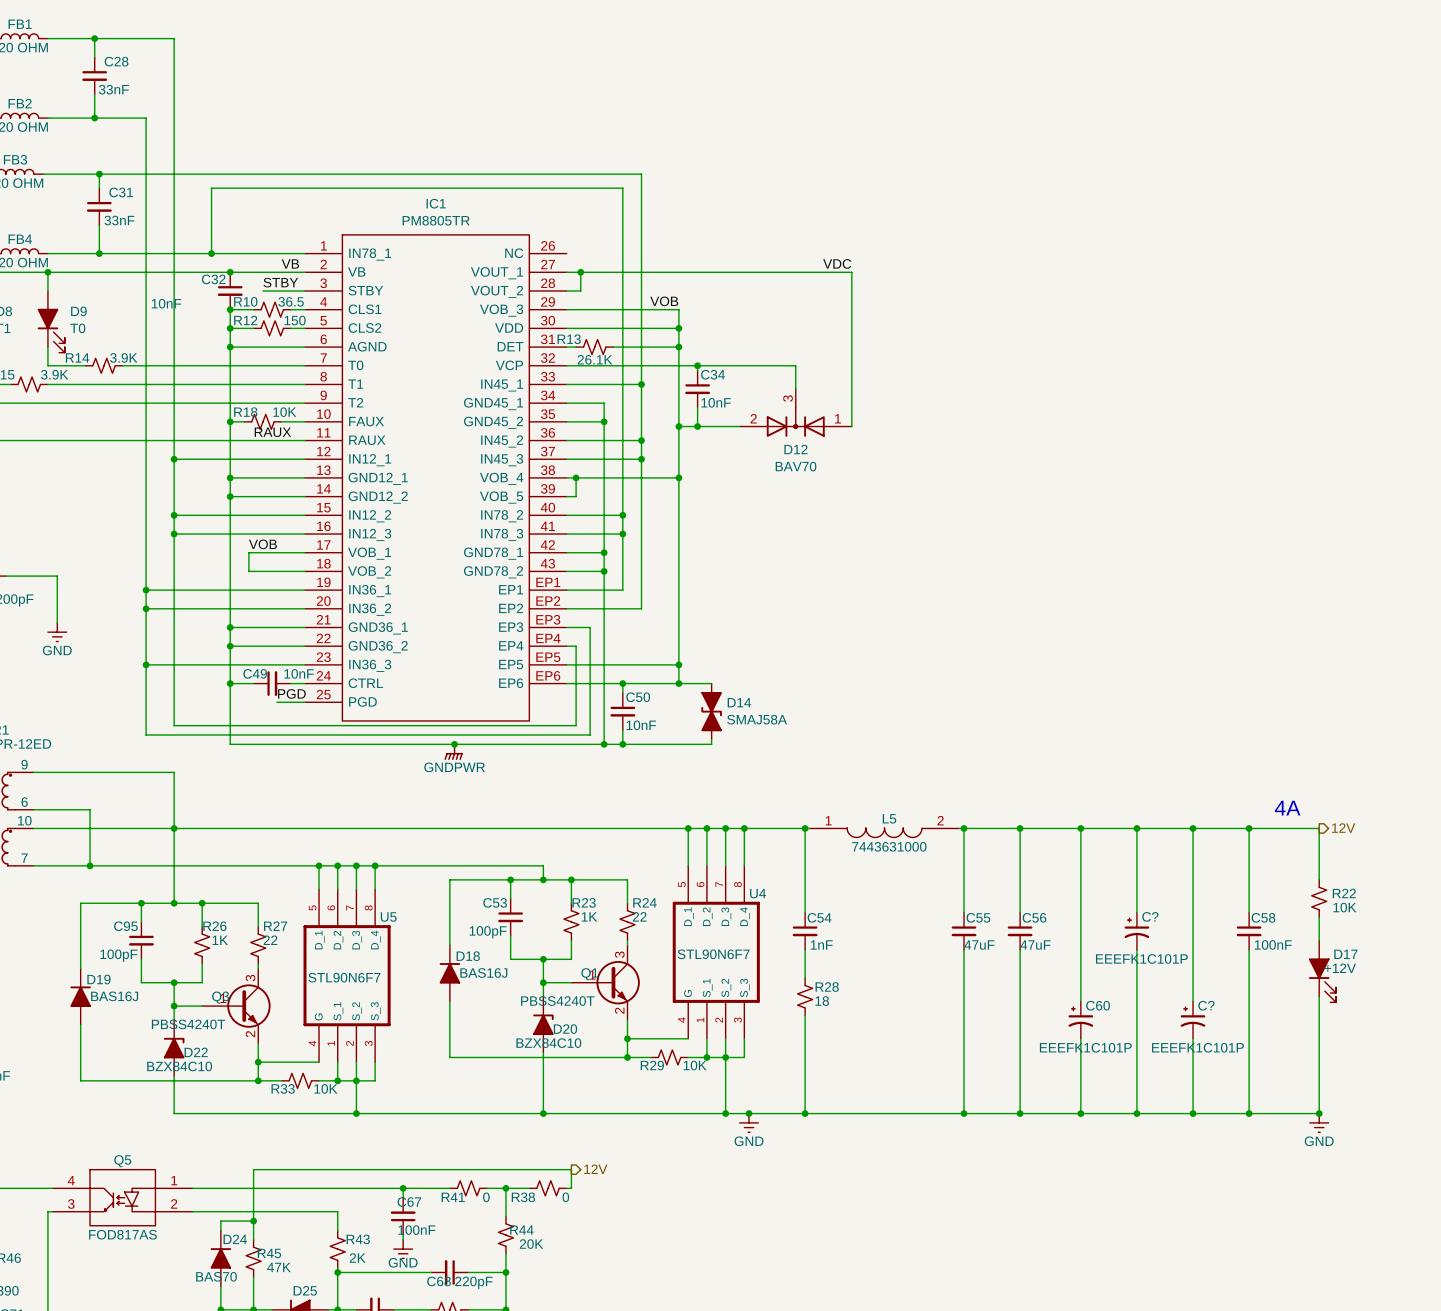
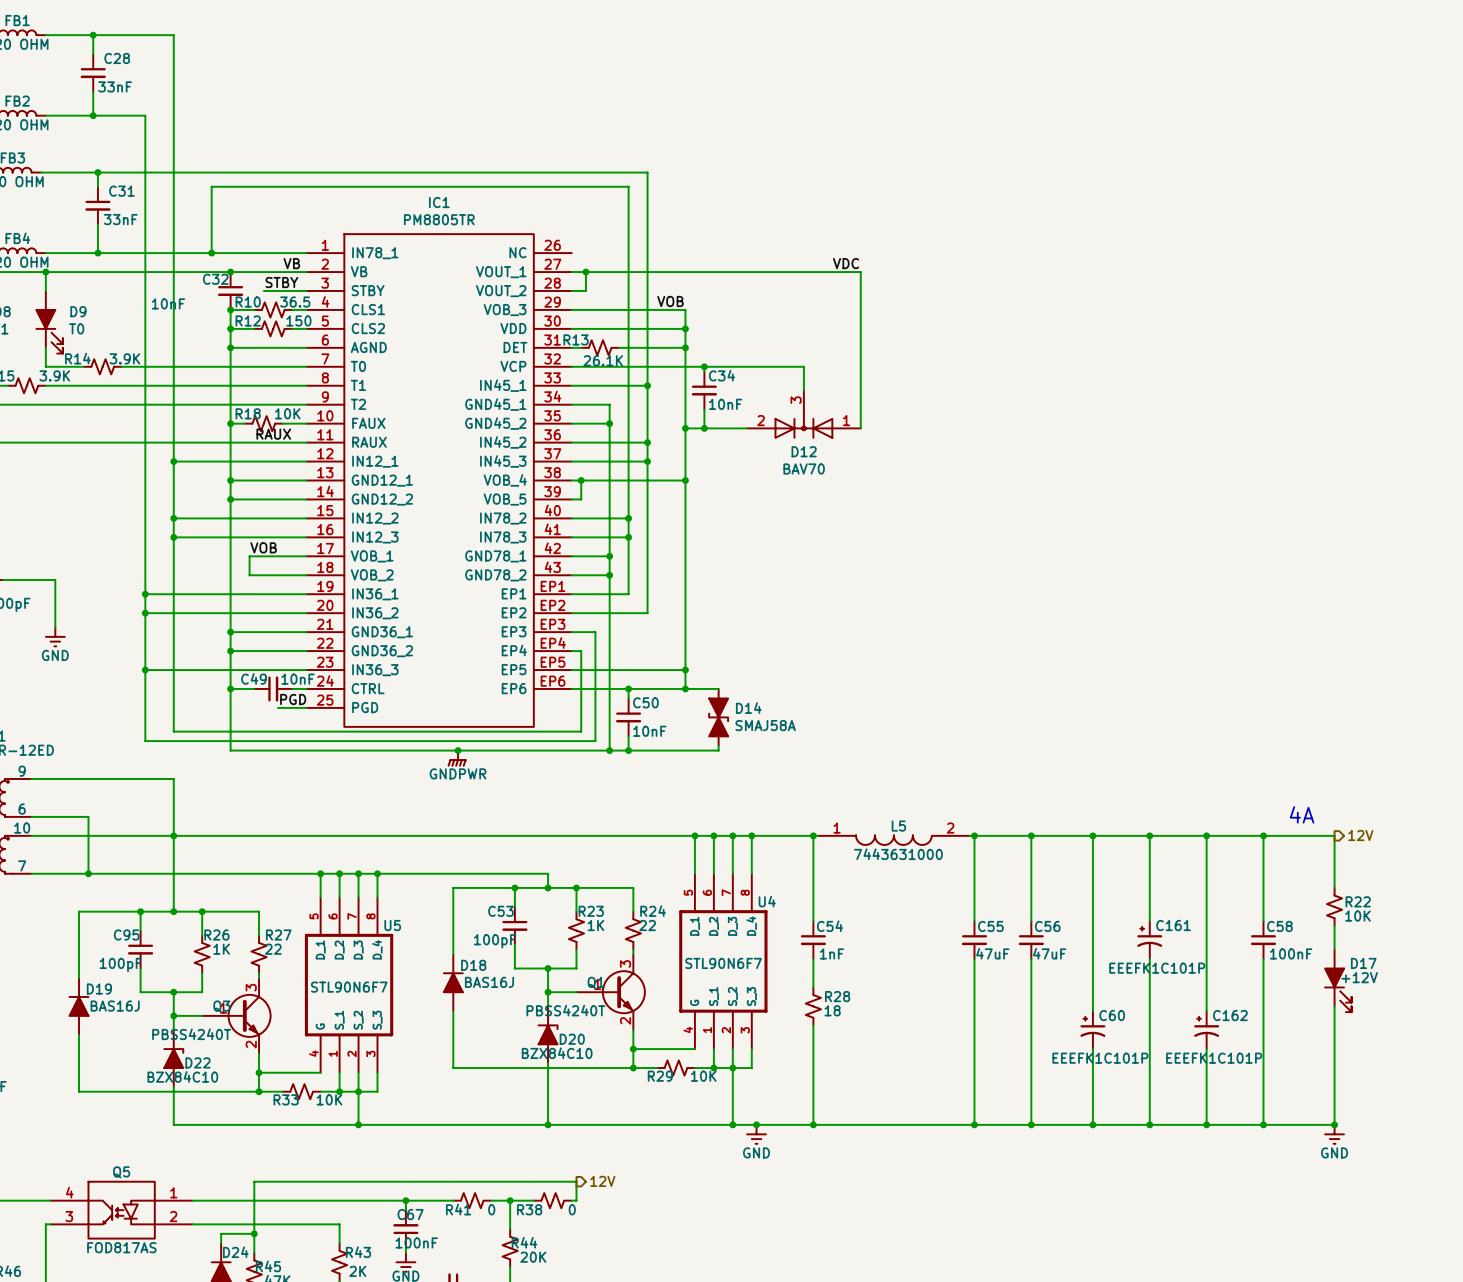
C? name: C? (1150, 916) -> C161 (1173, 925)
C? name: C? (1206, 1005) -> C162 (1230, 1015)

